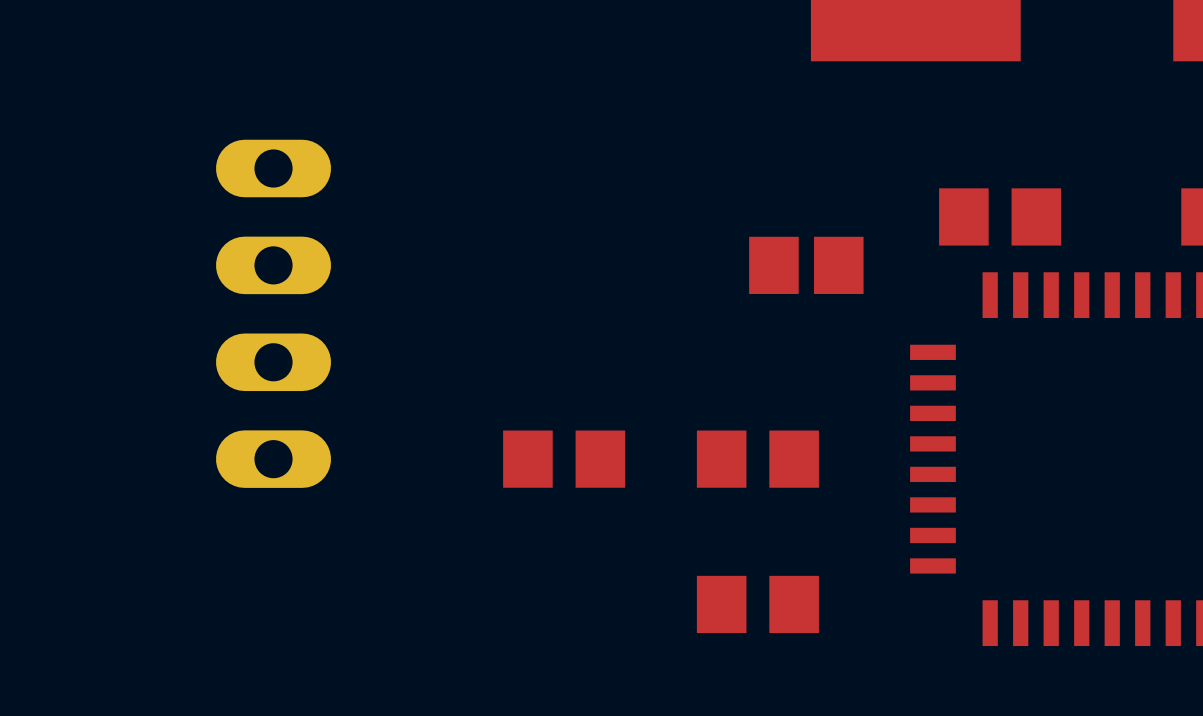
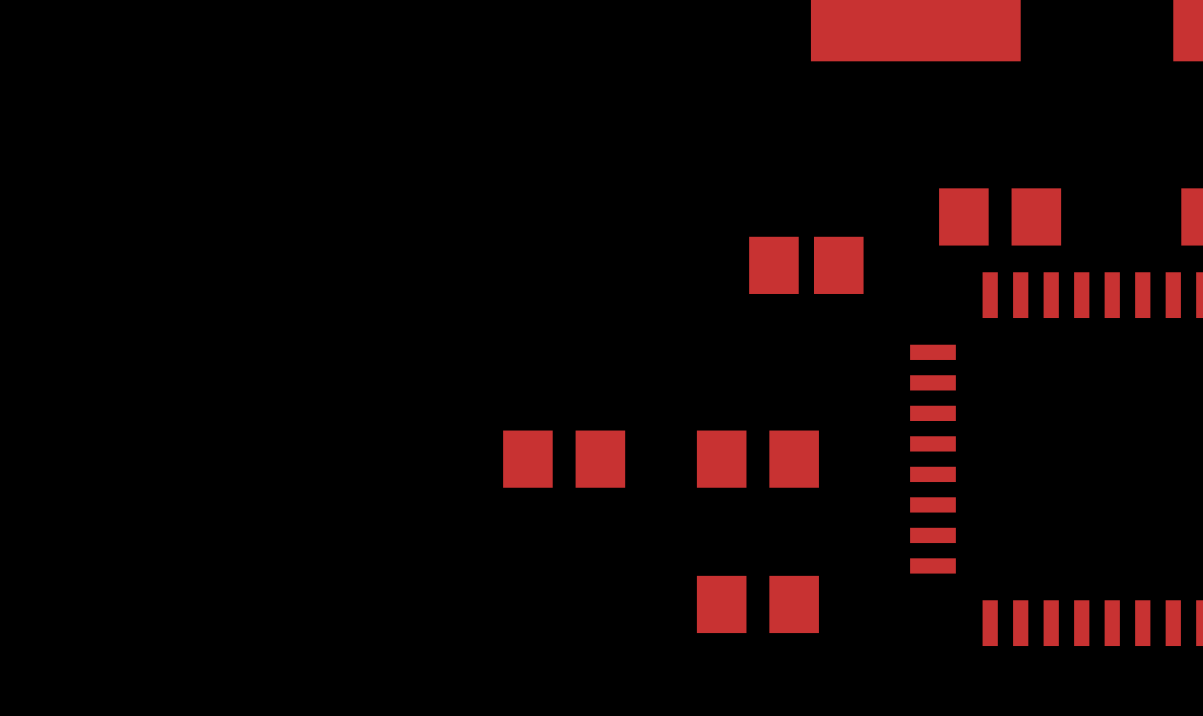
part: (273, 313) -> none

